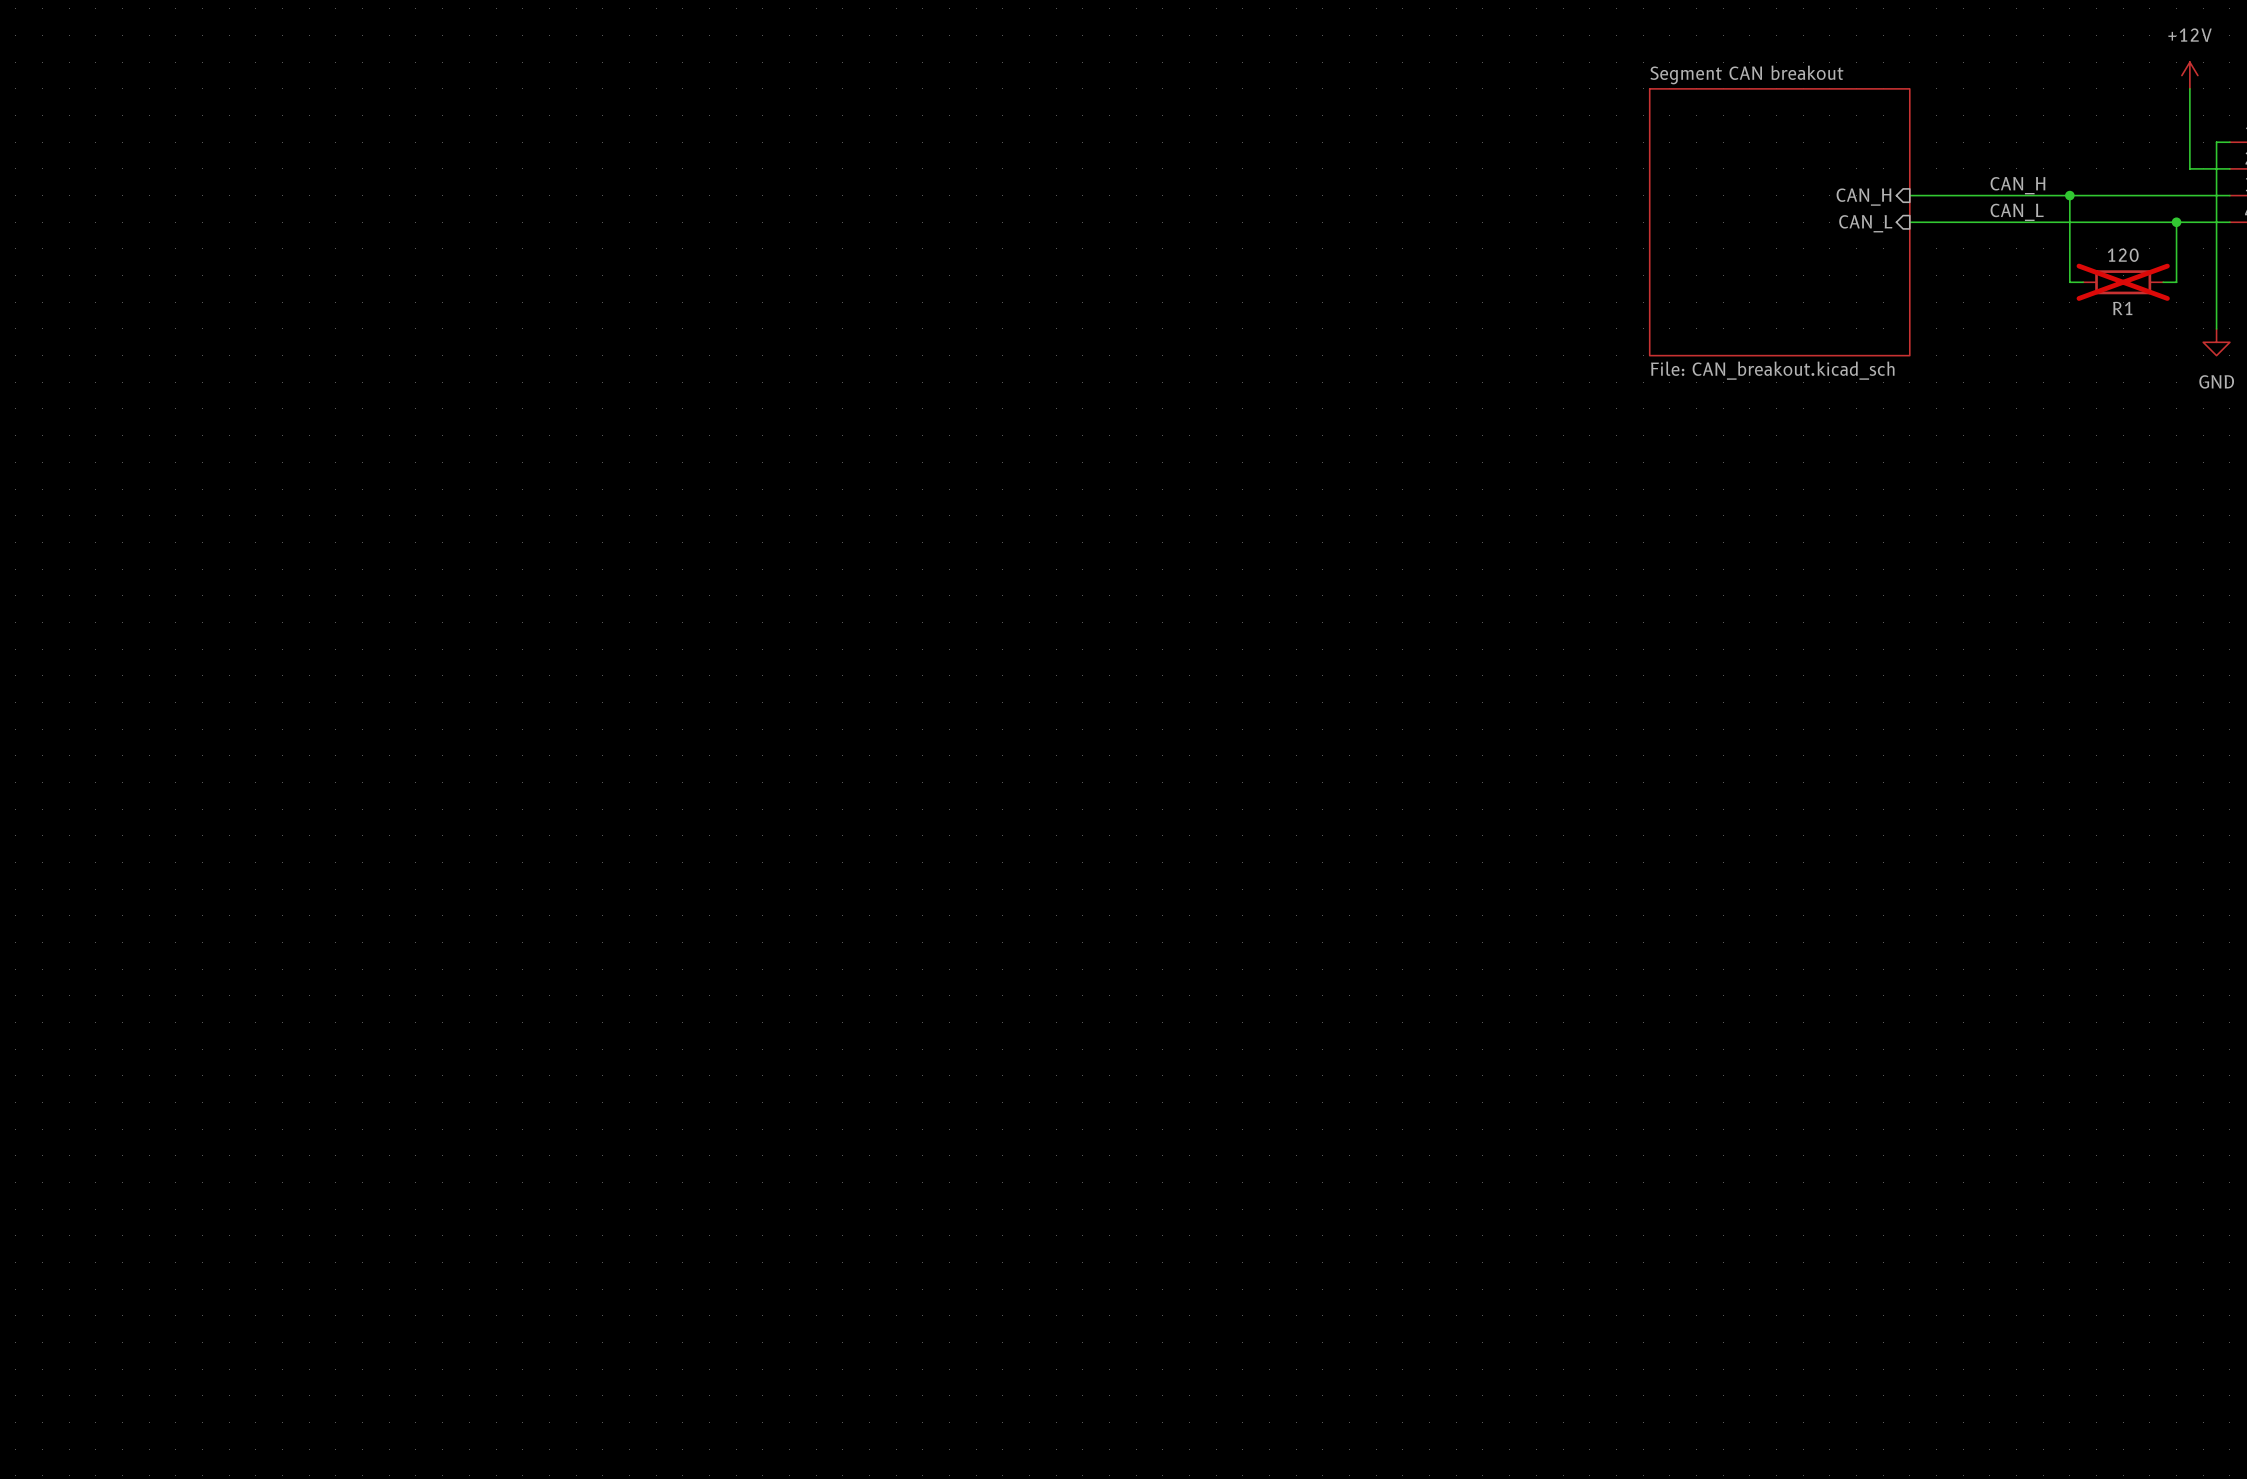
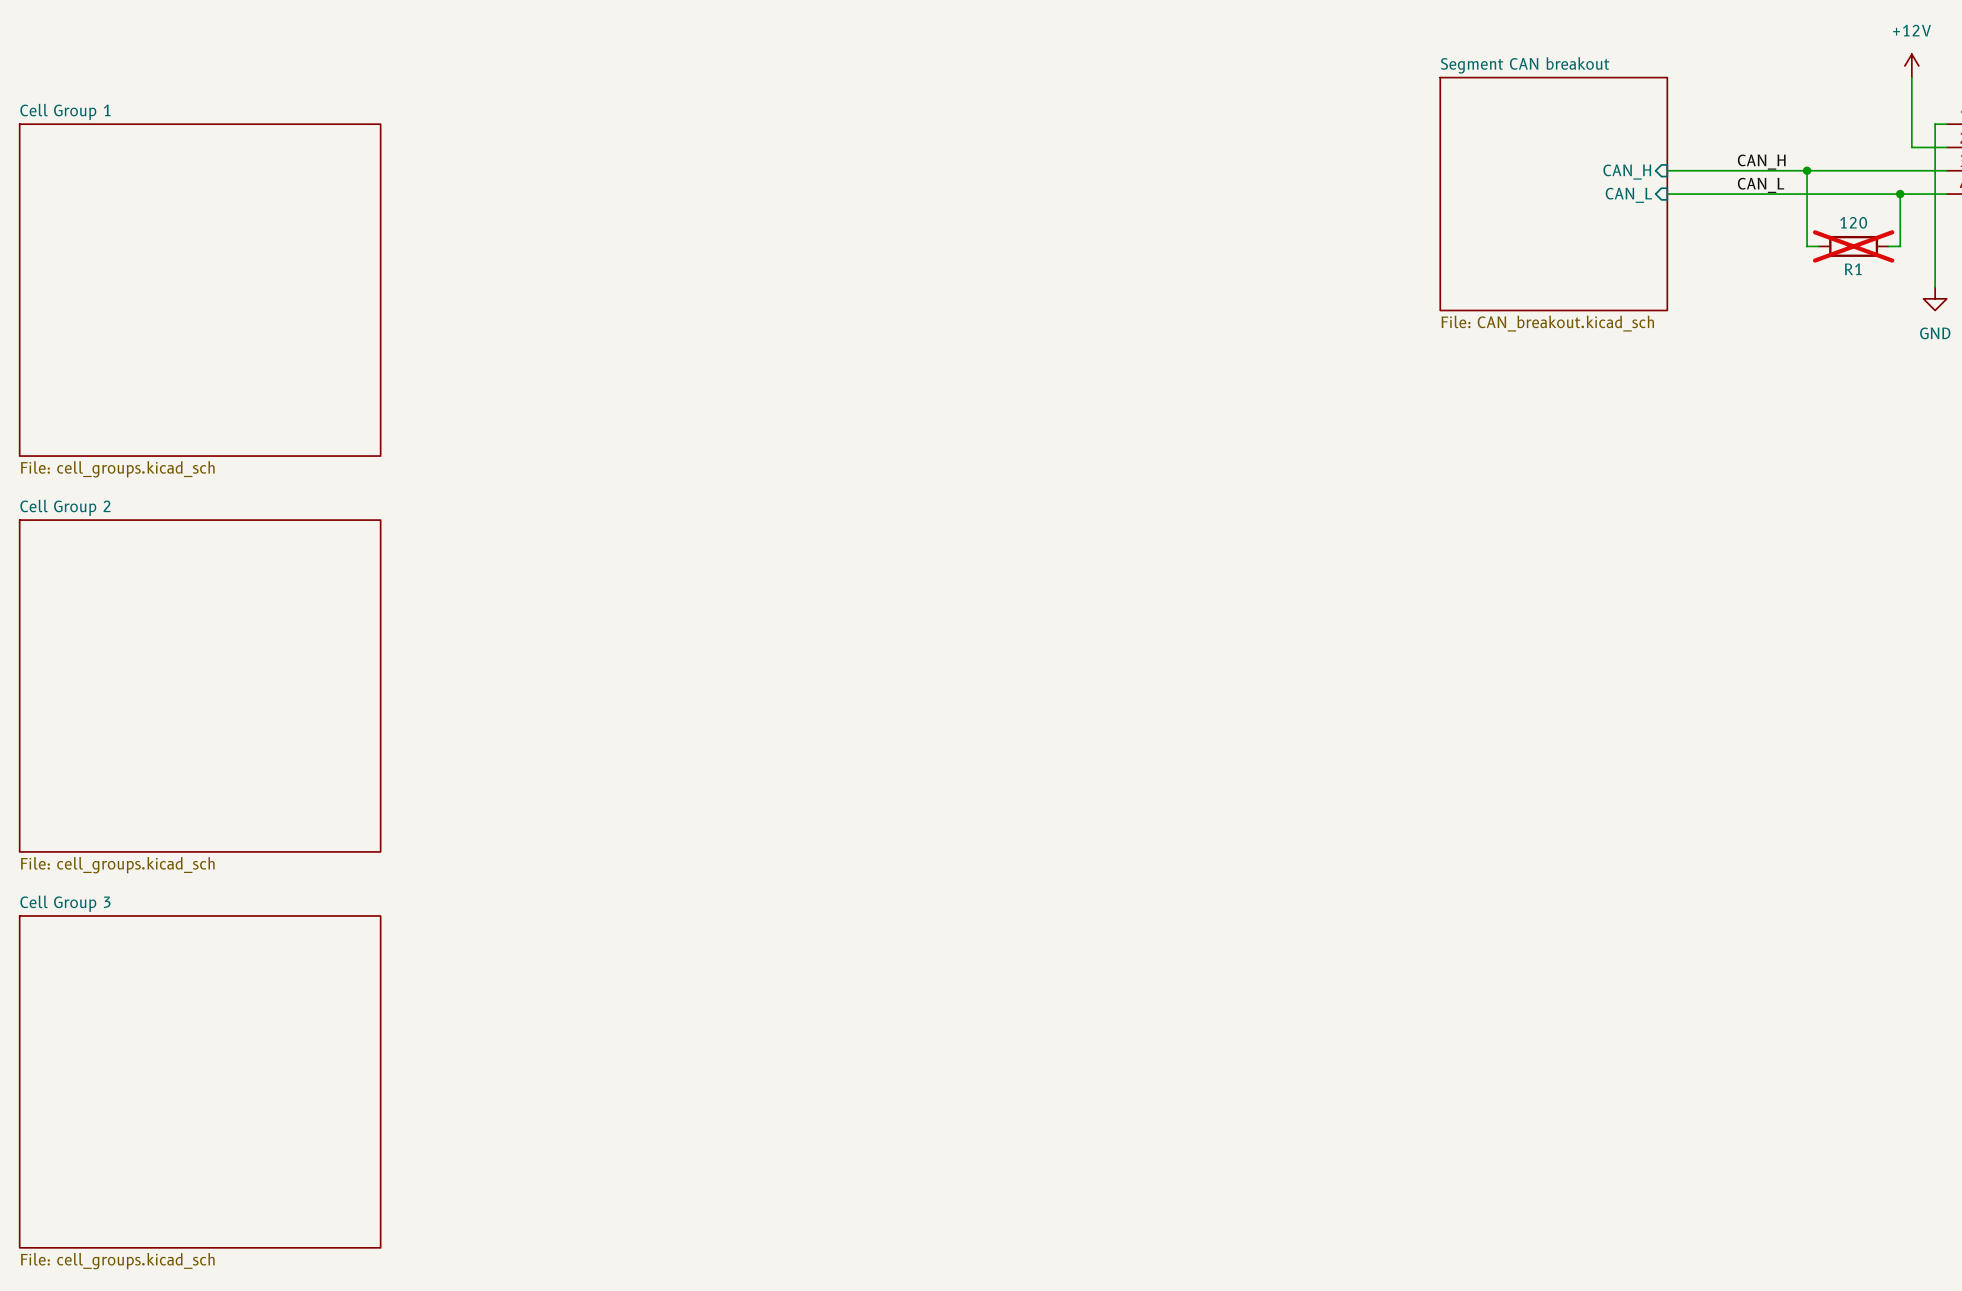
sheet Cell Group 1: none -> File: cell_groups.kicad_sch (200, 290)
sheet Cell Group 2: none -> File: cell_groups.kicad_sch (200, 686)
sheet Cell Group 3: none -> File: cell_groups.kicad_sch (200, 1081)

